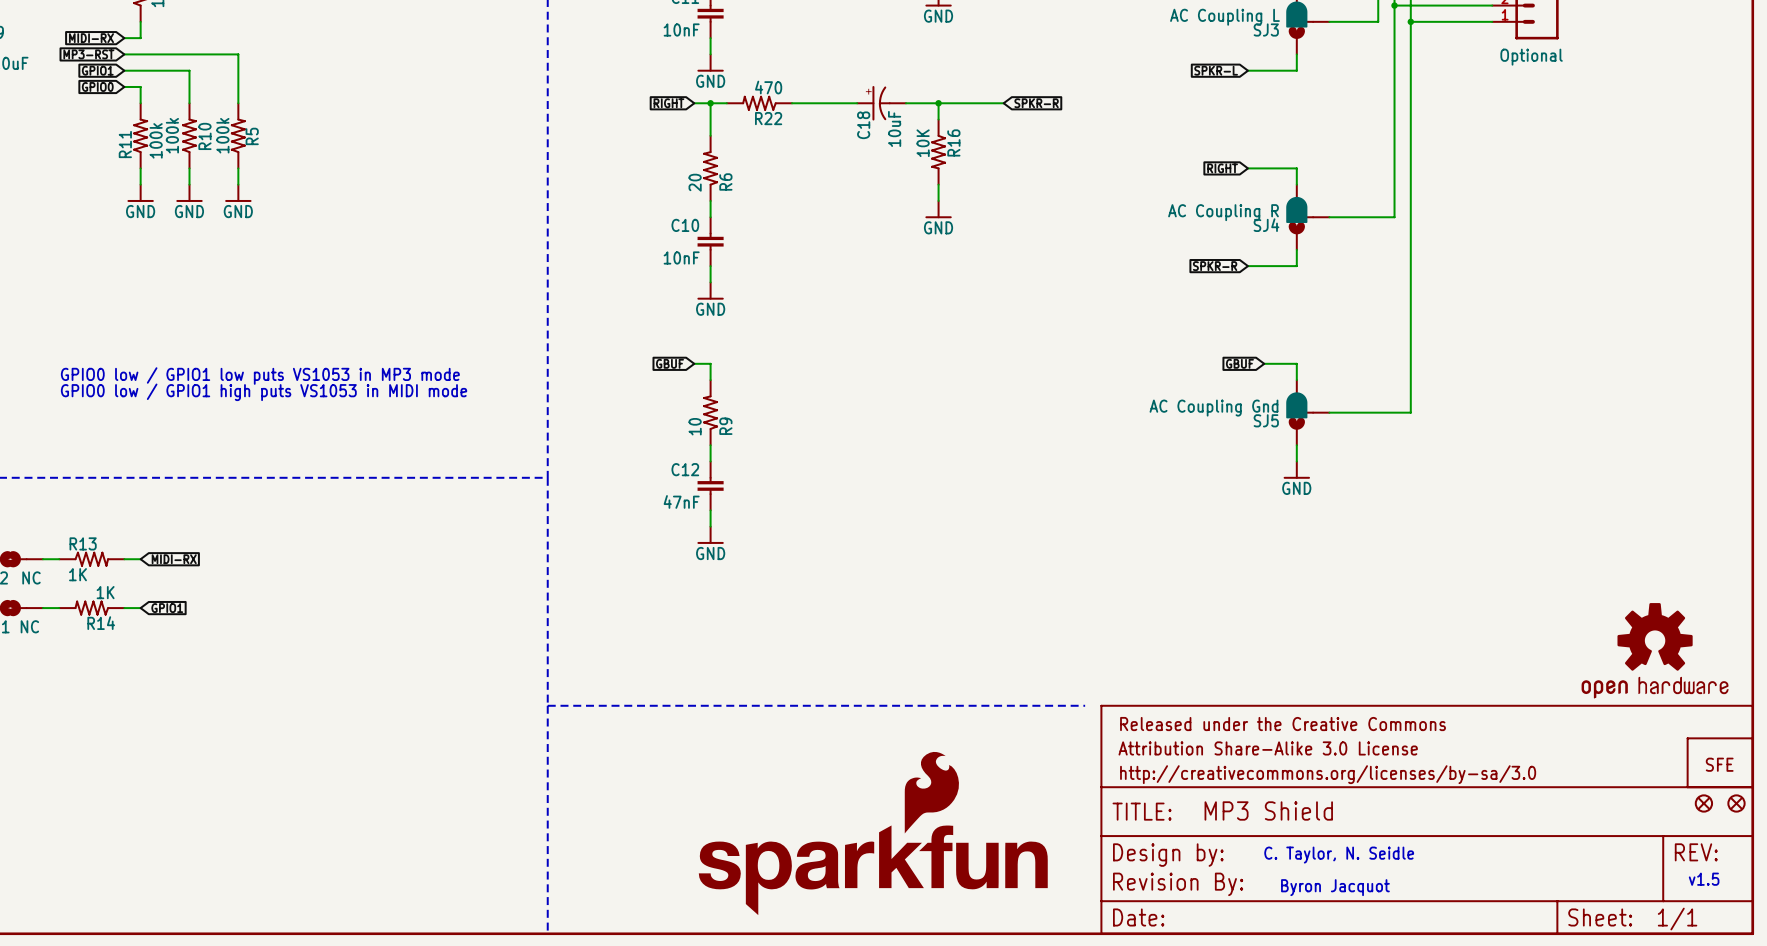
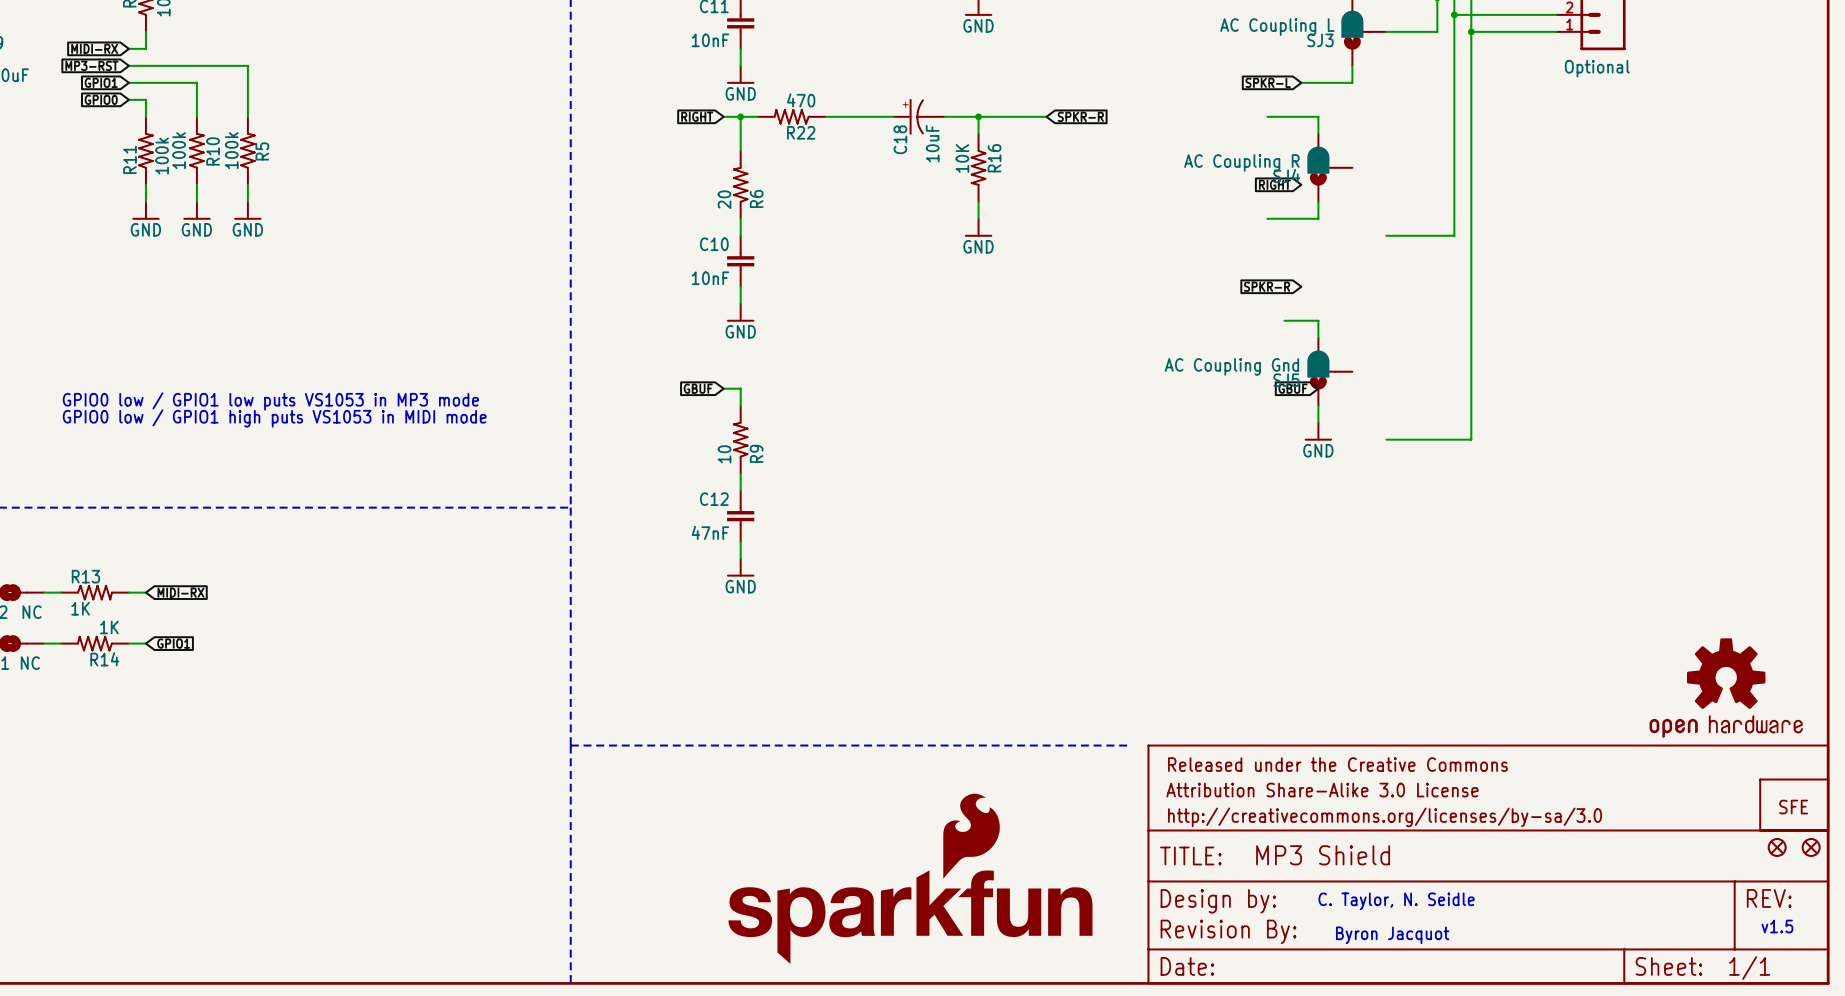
wire: (1247, 168) (1296, 168) (1296, 184) -> (1267, 116) (1318, 116) (1318, 133)
SJ4 position: (1307, 217) -> (1329, 167)
wire: (1296, 249) (1296, 266) (1247, 266) -> (1318, 201) (1318, 218) (1267, 218)
wire: (1264, 363) (1296, 363) (1296, 380) -> (1284, 320) (1318, 320) (1318, 337)
SJ5 position: (1307, 412) -> (1329, 371)
wire: (1296, 445) (1296, 461) -> (1318, 405) (1318, 422)
power symbol position: GND (1296, 470) -> GND (1318, 431)

